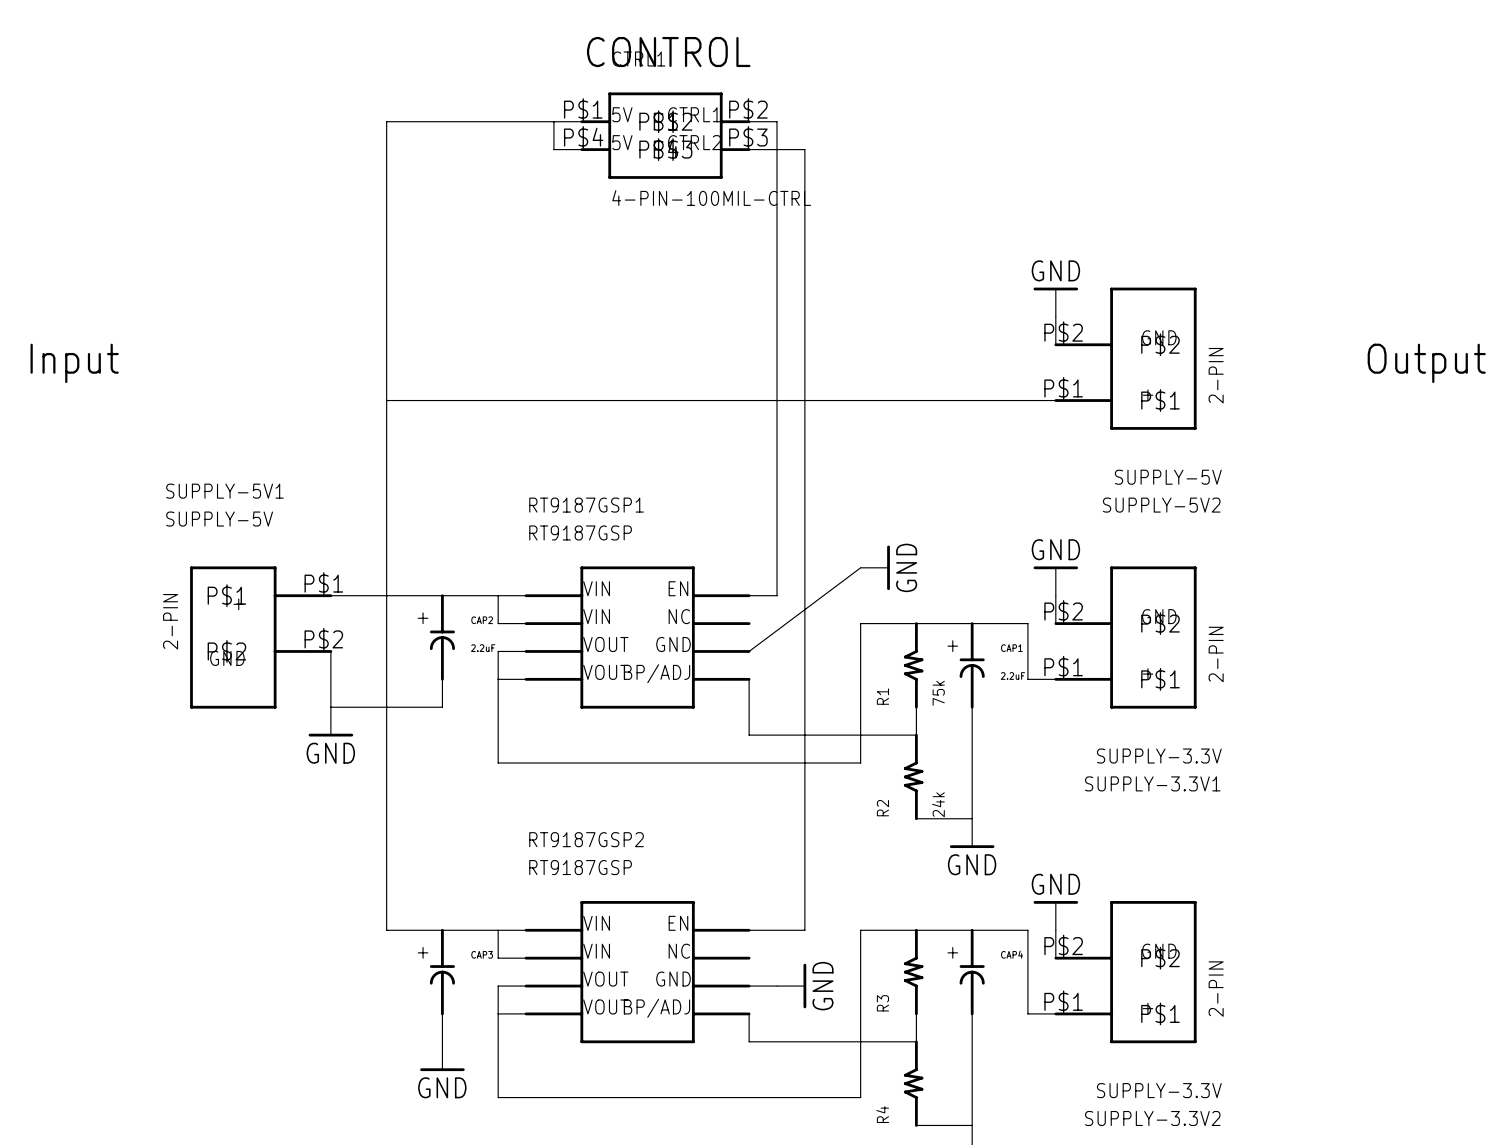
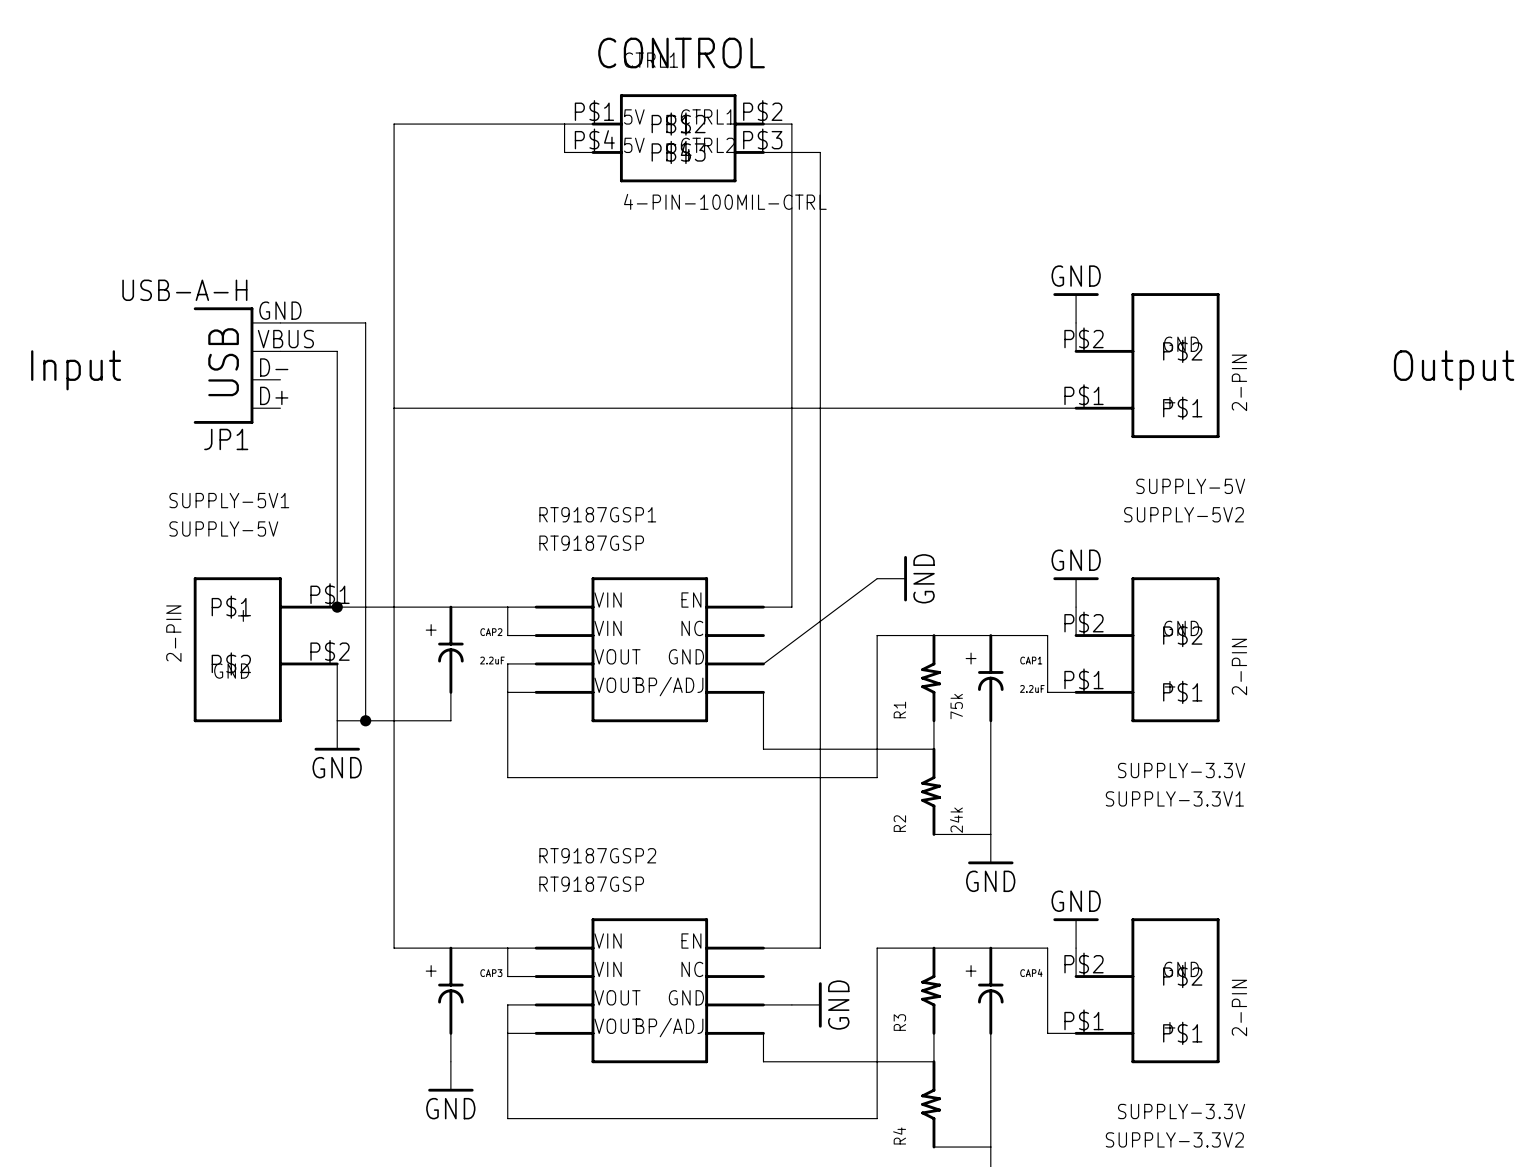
wire: none -> (280, 322) (365, 322) (365, 720)
wire: none -> (280, 351) (337, 351) (337, 607)
JP1: none -> USB-A-H (237, 365)
junction: none -> (337, 607)
junction: none -> (365, 720)

